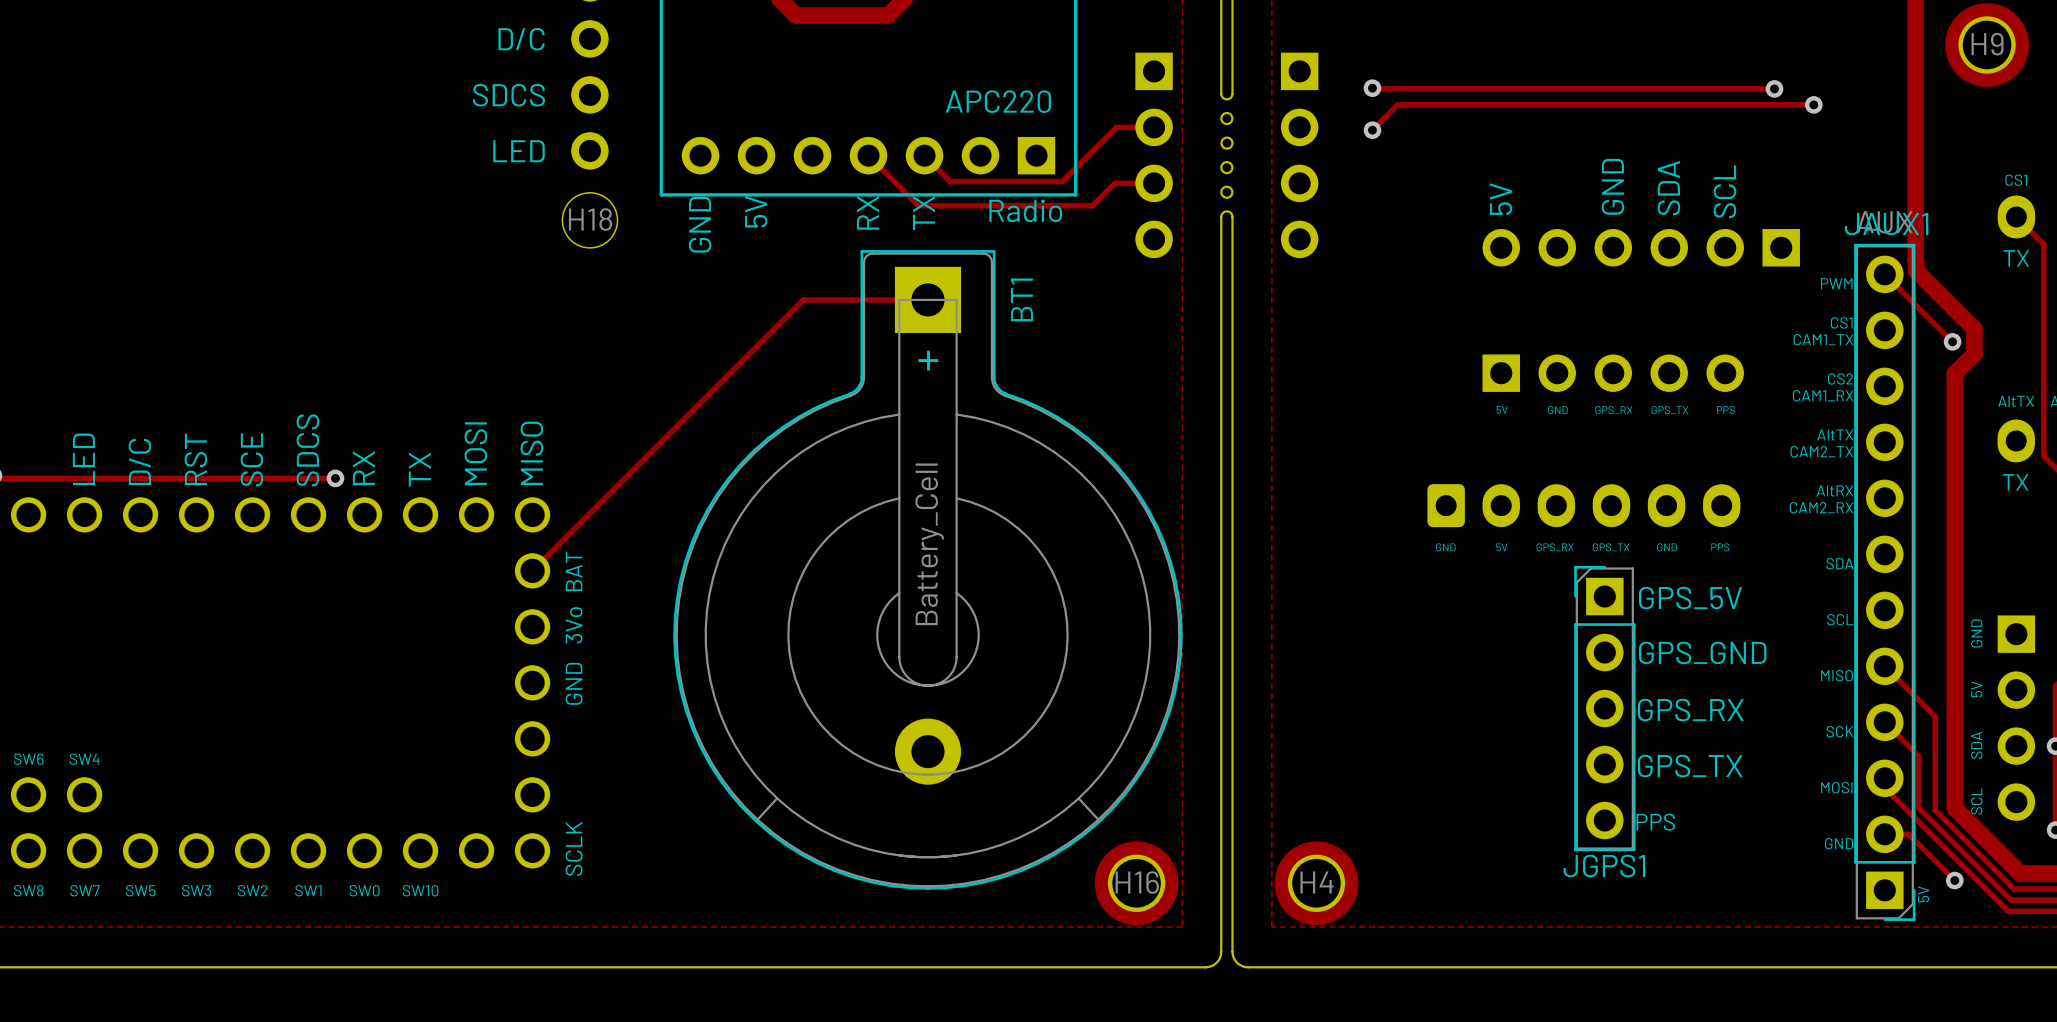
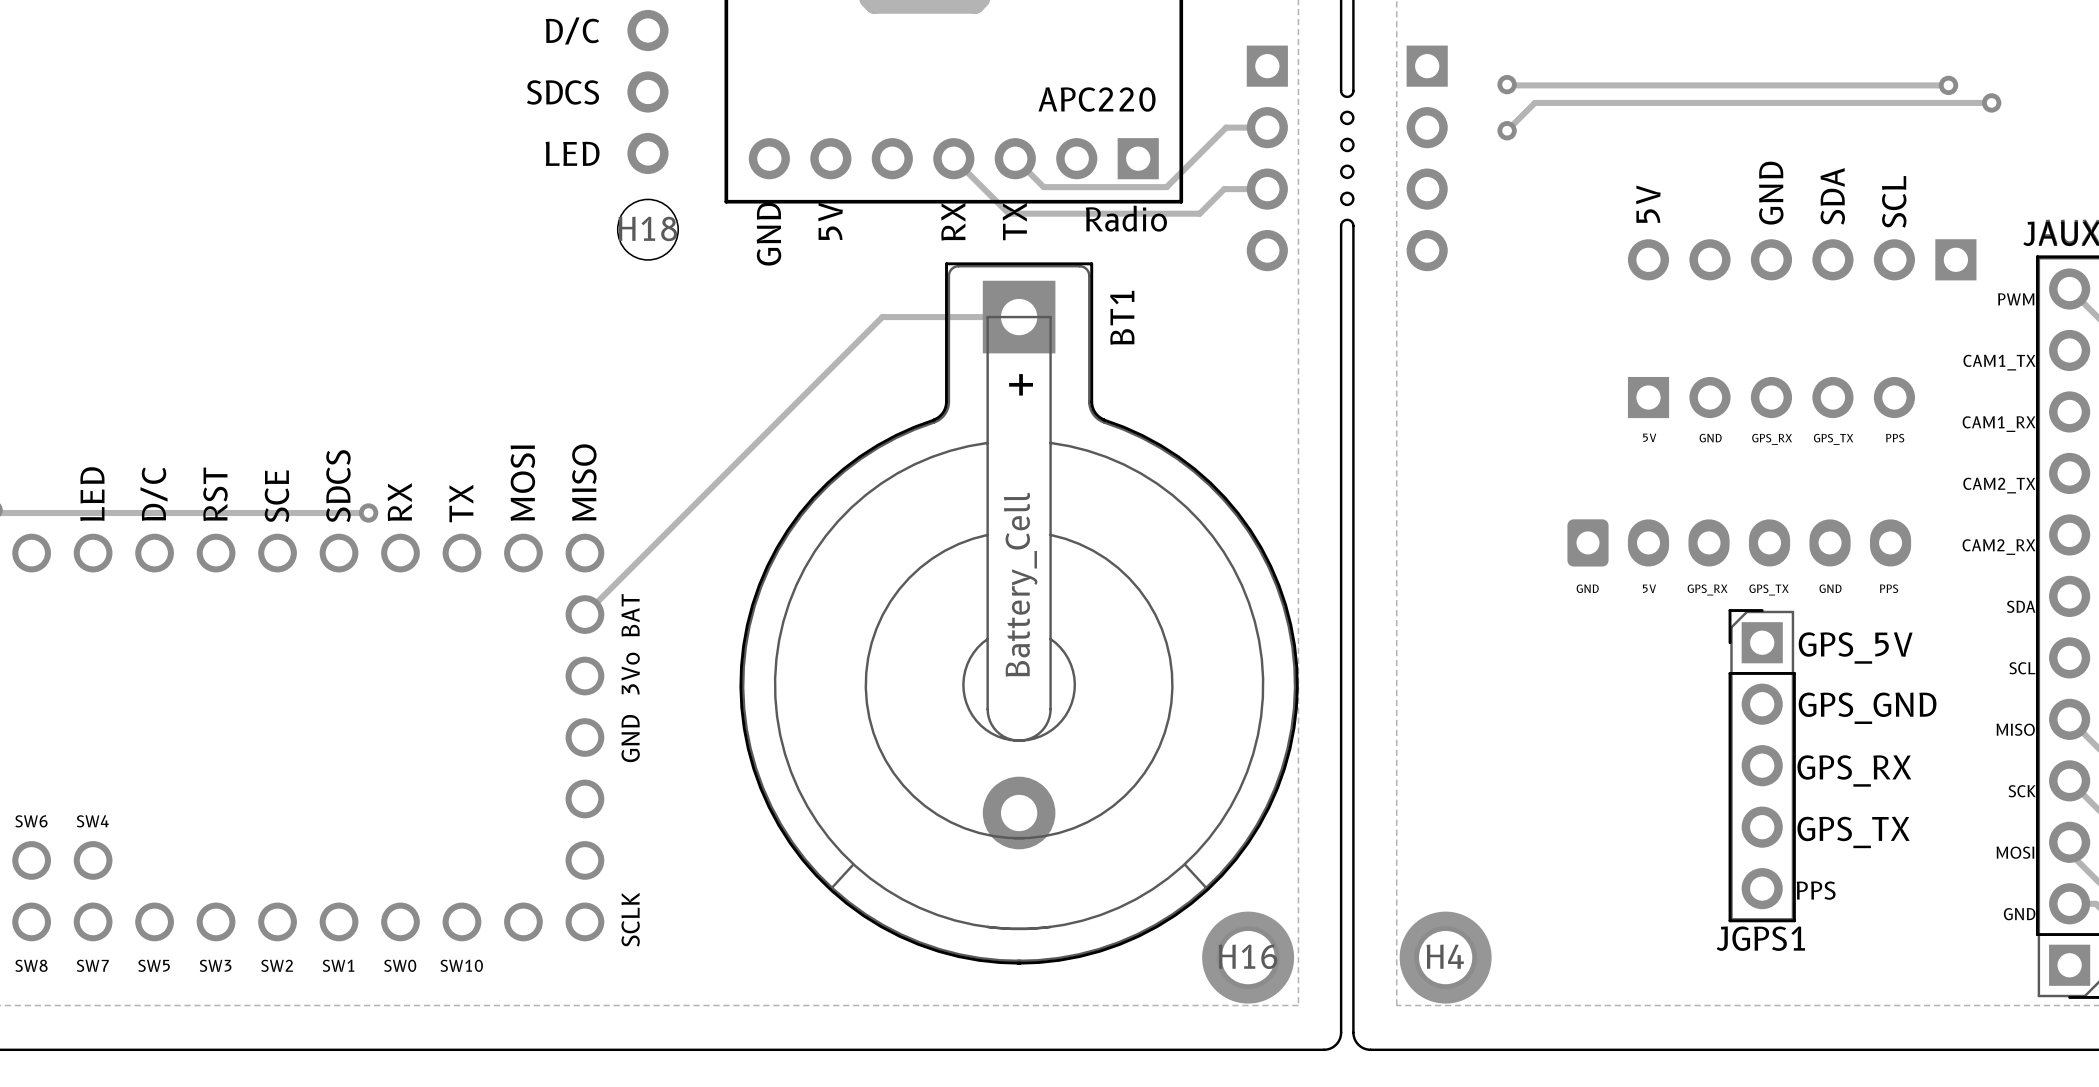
text: CS1 (1841, 322) -> none
text: CS2 (1840, 378) -> none
text: AltTX (1835, 434) -> none
text: AltRX (1835, 490) -> none

